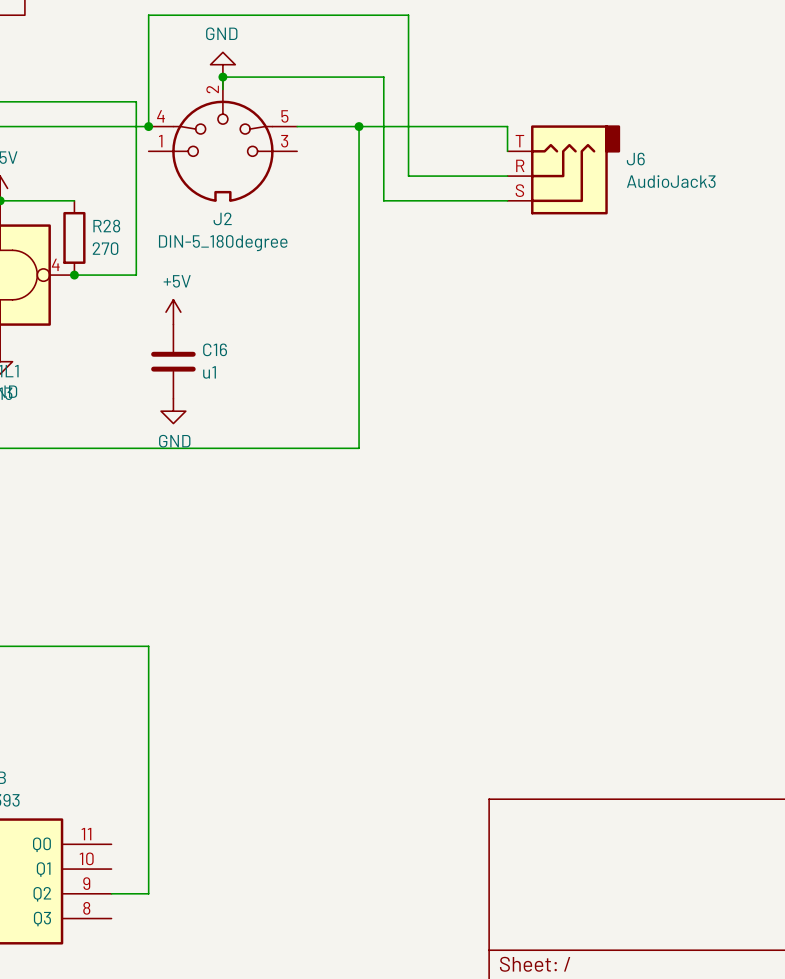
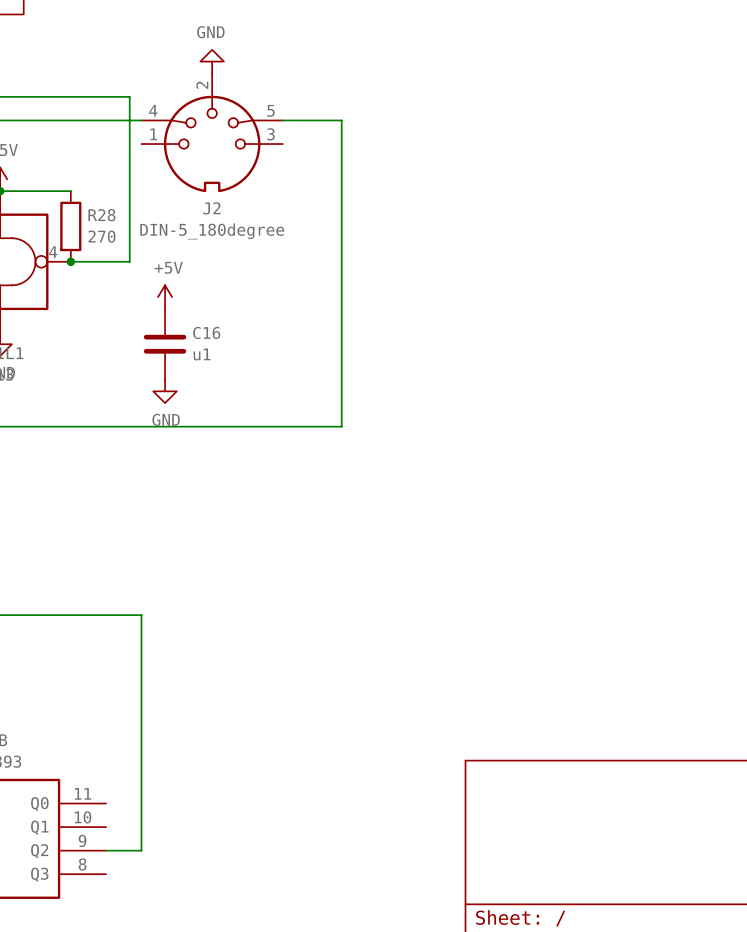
junction: (222, 77) -> none
wire: (222, 89) (222, 77) (383, 77) (383, 200) (507, 200) -> none
wire: (148, 126) (148, 15) (408, 15) (408, 176) (507, 176) -> none
junction: (148, 126) -> none
wire: (359, 126) (507, 126) (507, 151) -> none
junction: (359, 126) -> none
J6: AudioJack3 (563, 169) -> none

